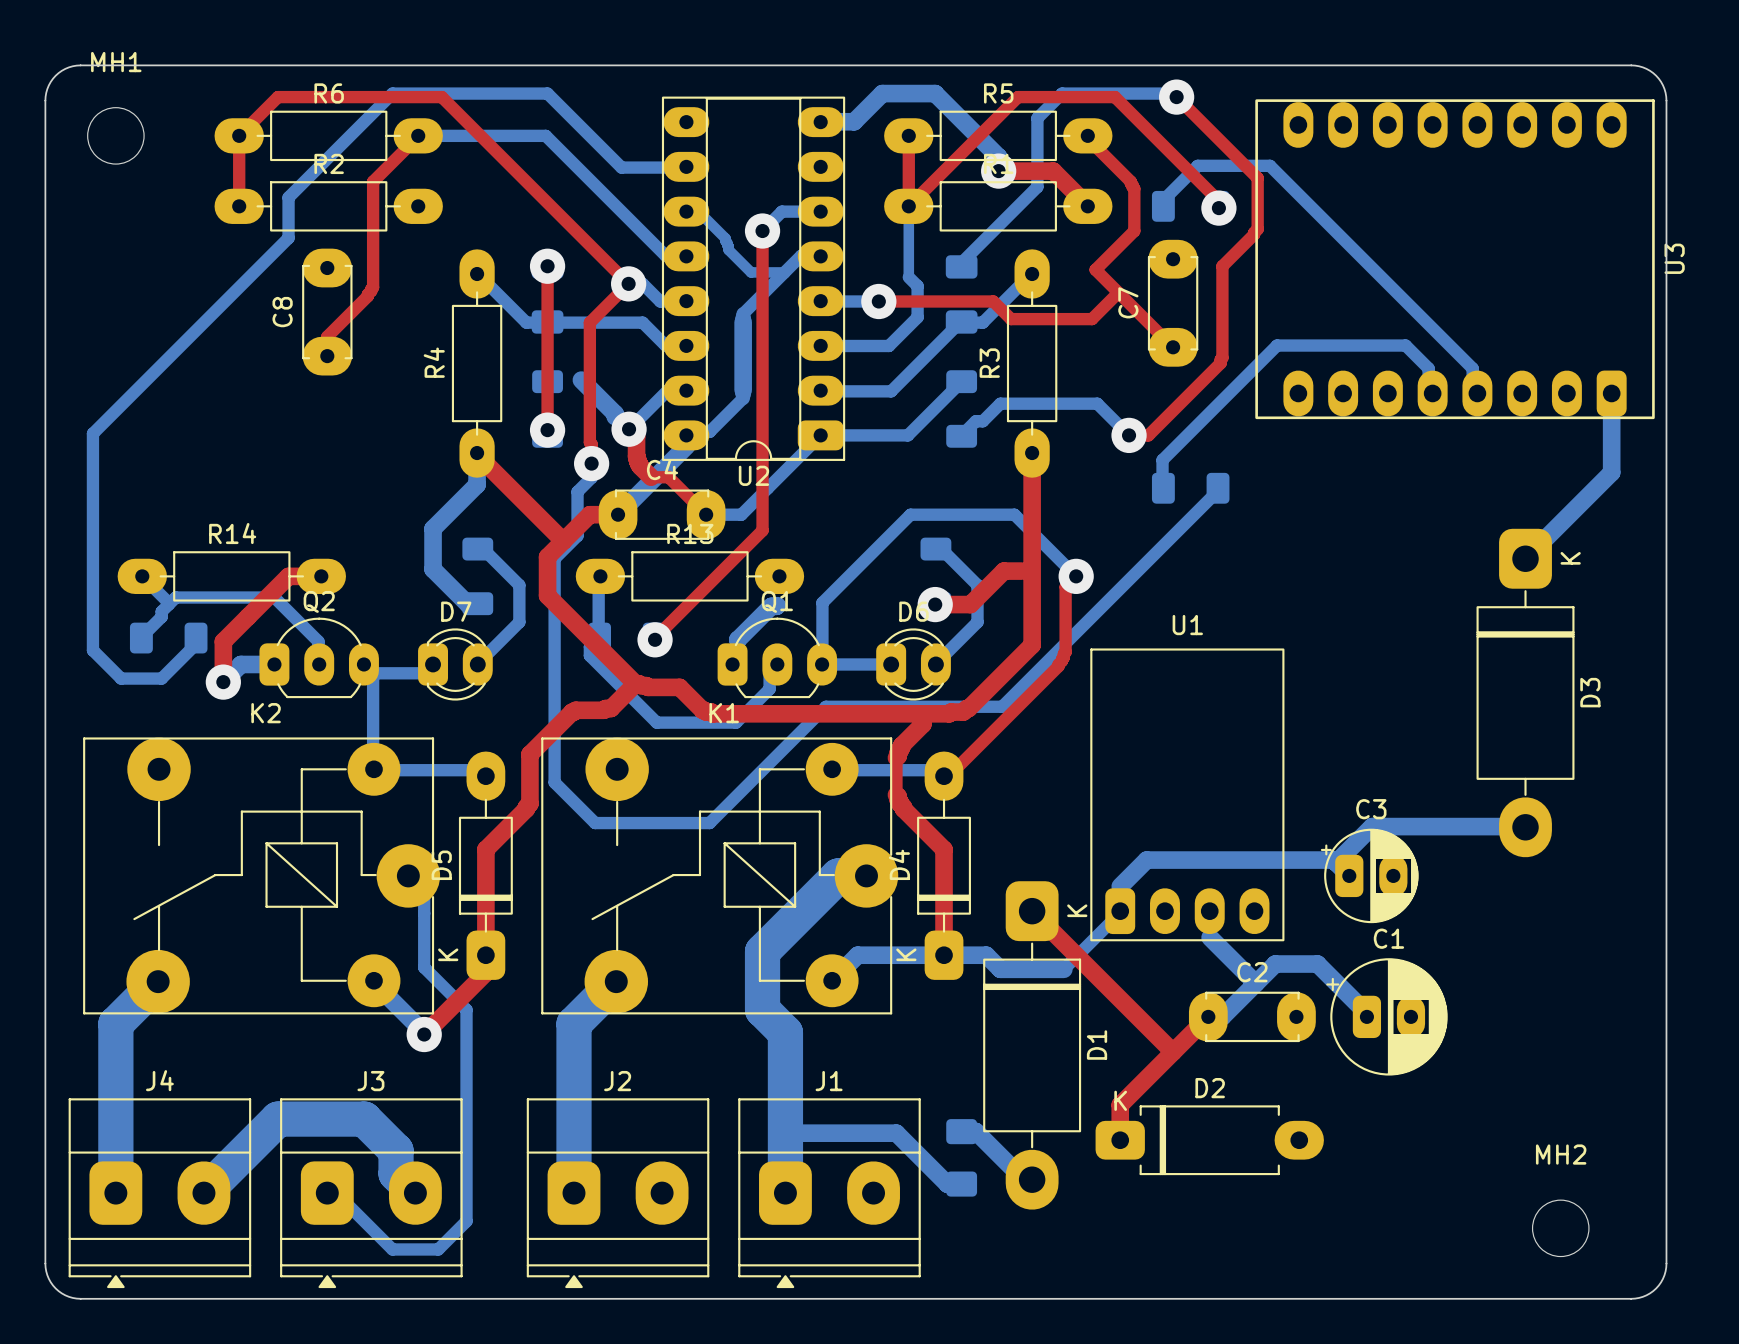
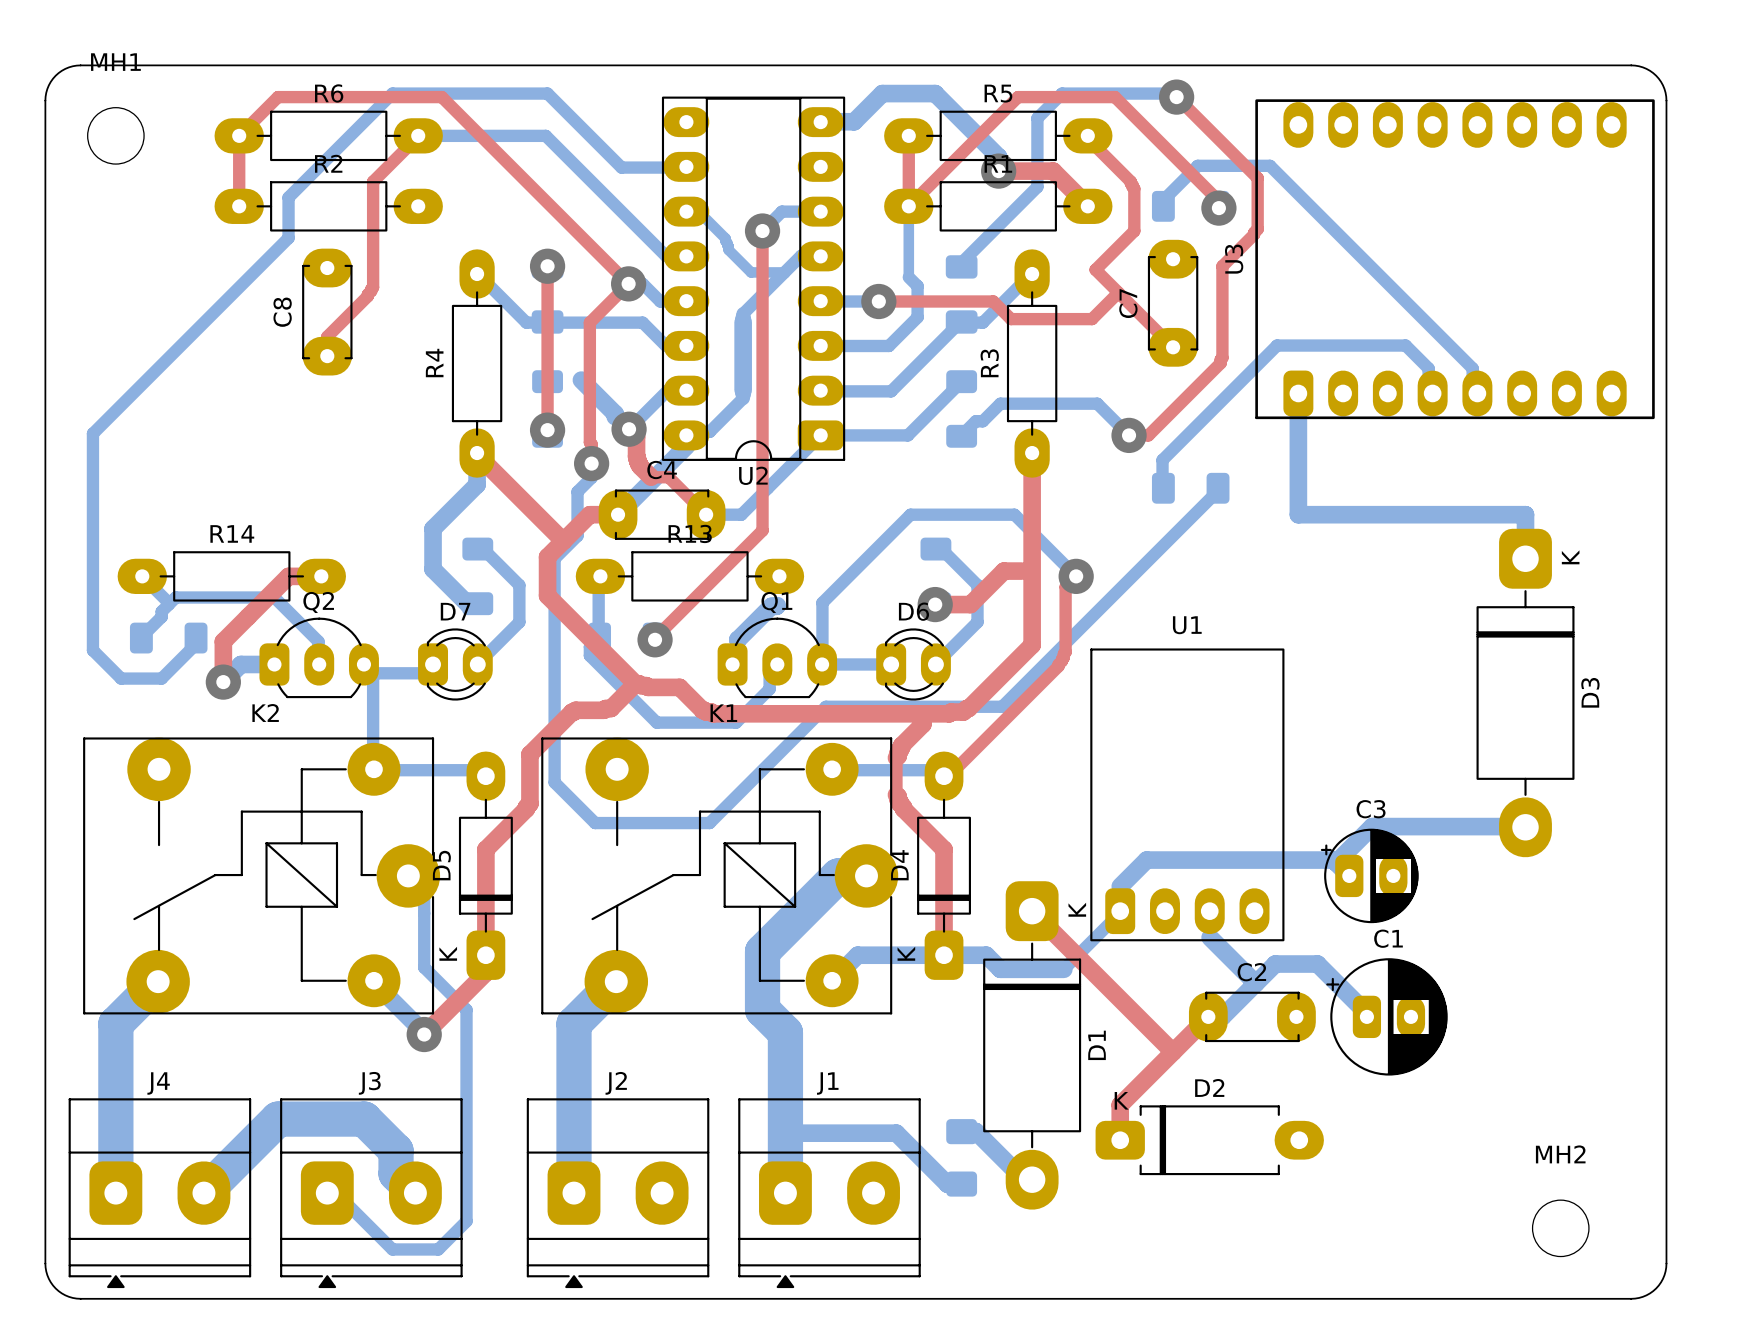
U3 footprint: [1255, 99, 1655, 420] -> [1255, 99, 1655, 420]
U3 name position: U3 (1674, 258) -> U3 (1234, 259)
bottom track: (1611, 393) (1611, 472) (1525, 558) -> (1298, 393) (1298, 514) (1525, 514) (1525, 558)

